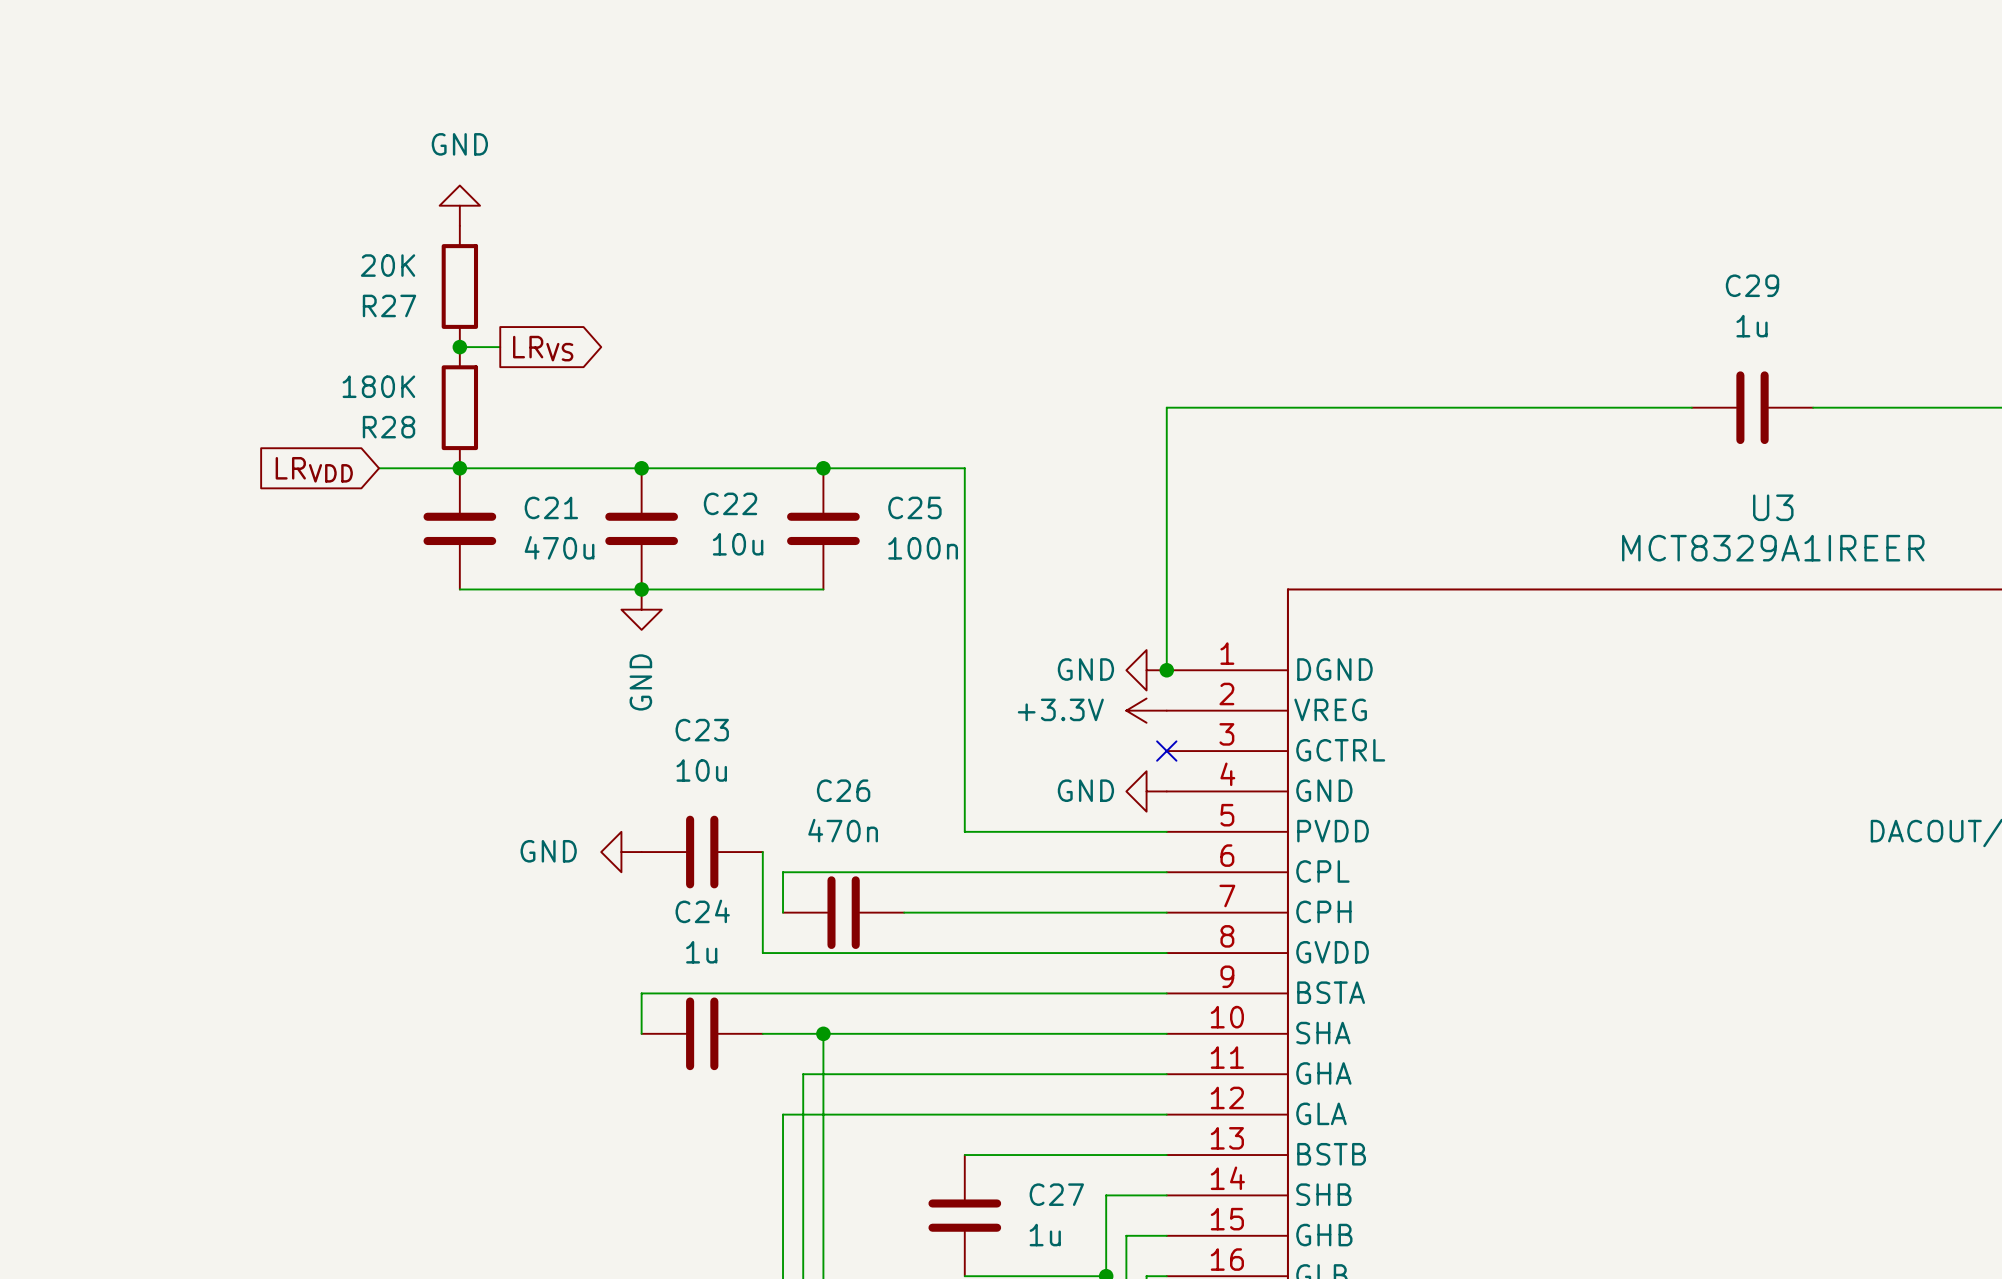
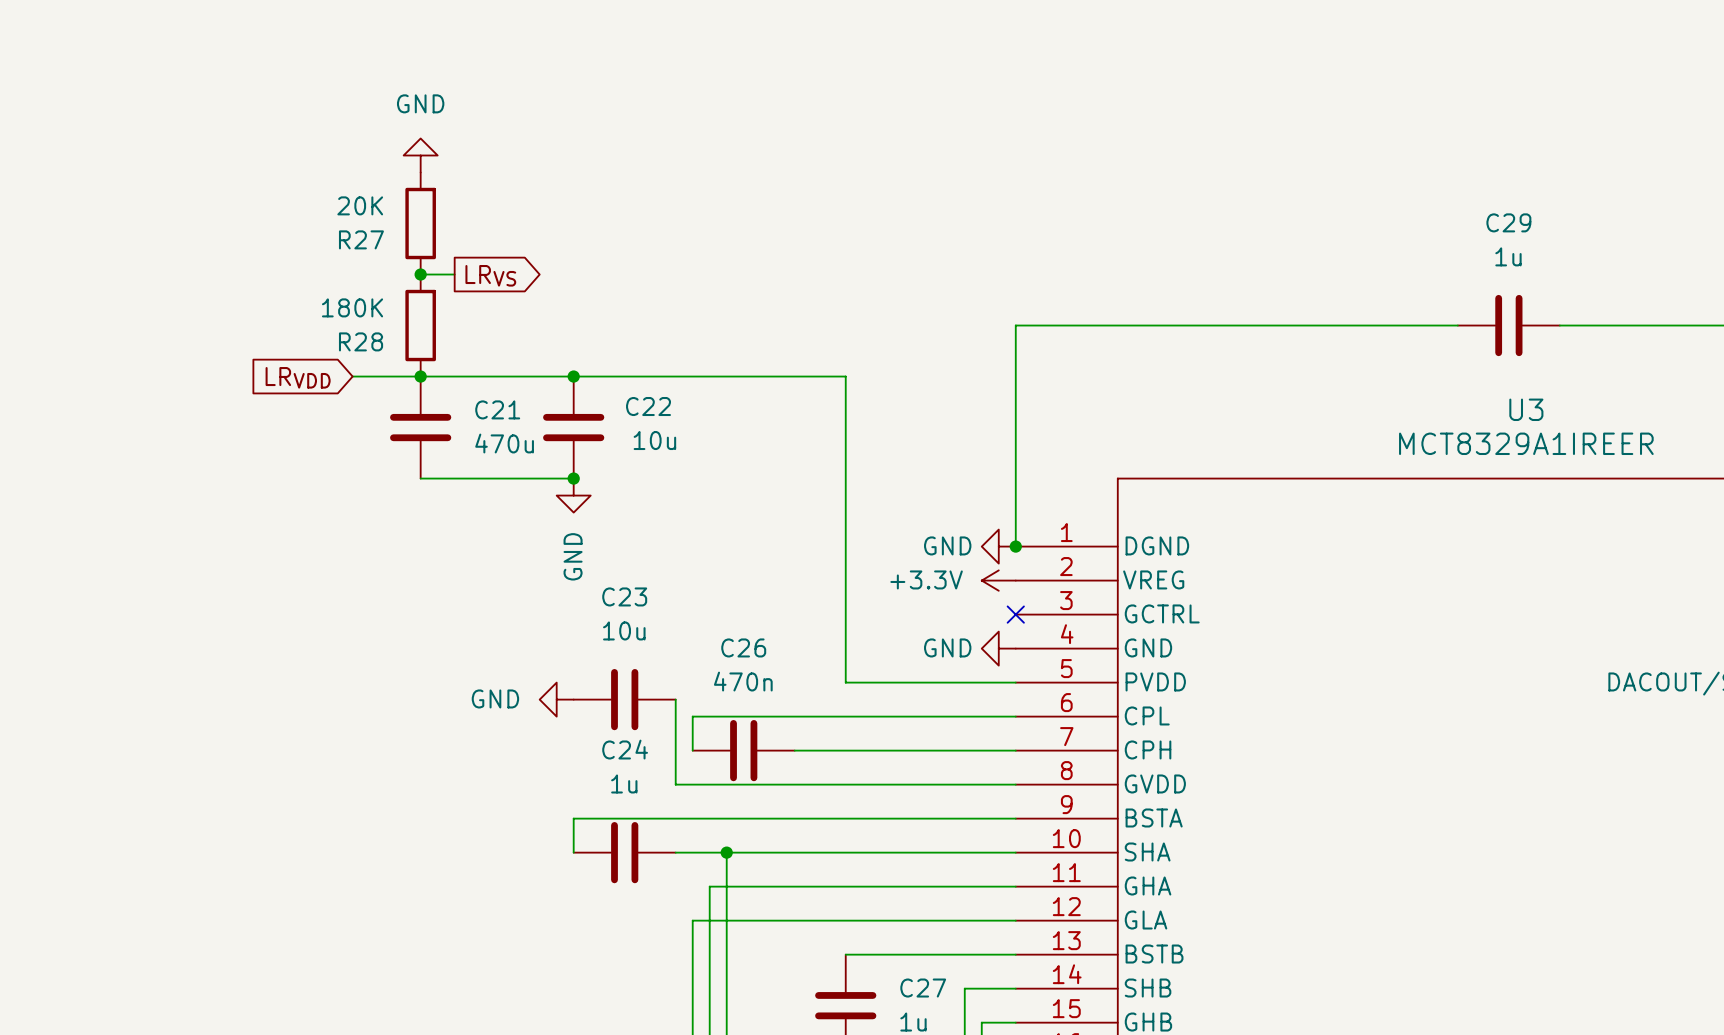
junction: (823, 468) -> none
C25: 100n (823, 528) -> none
wire: (641, 589) (823, 589) -> none

